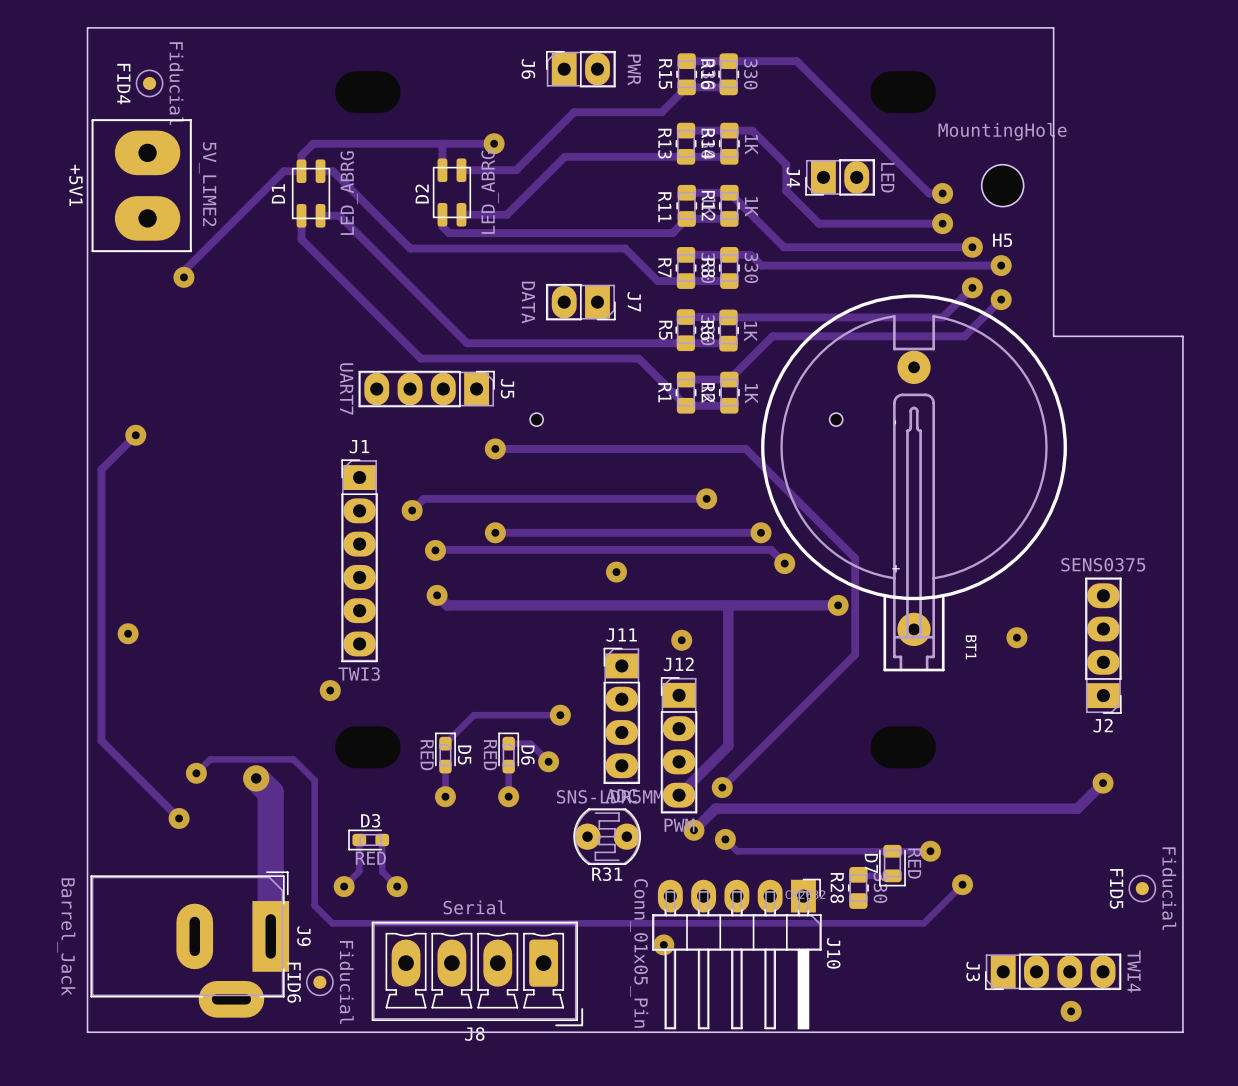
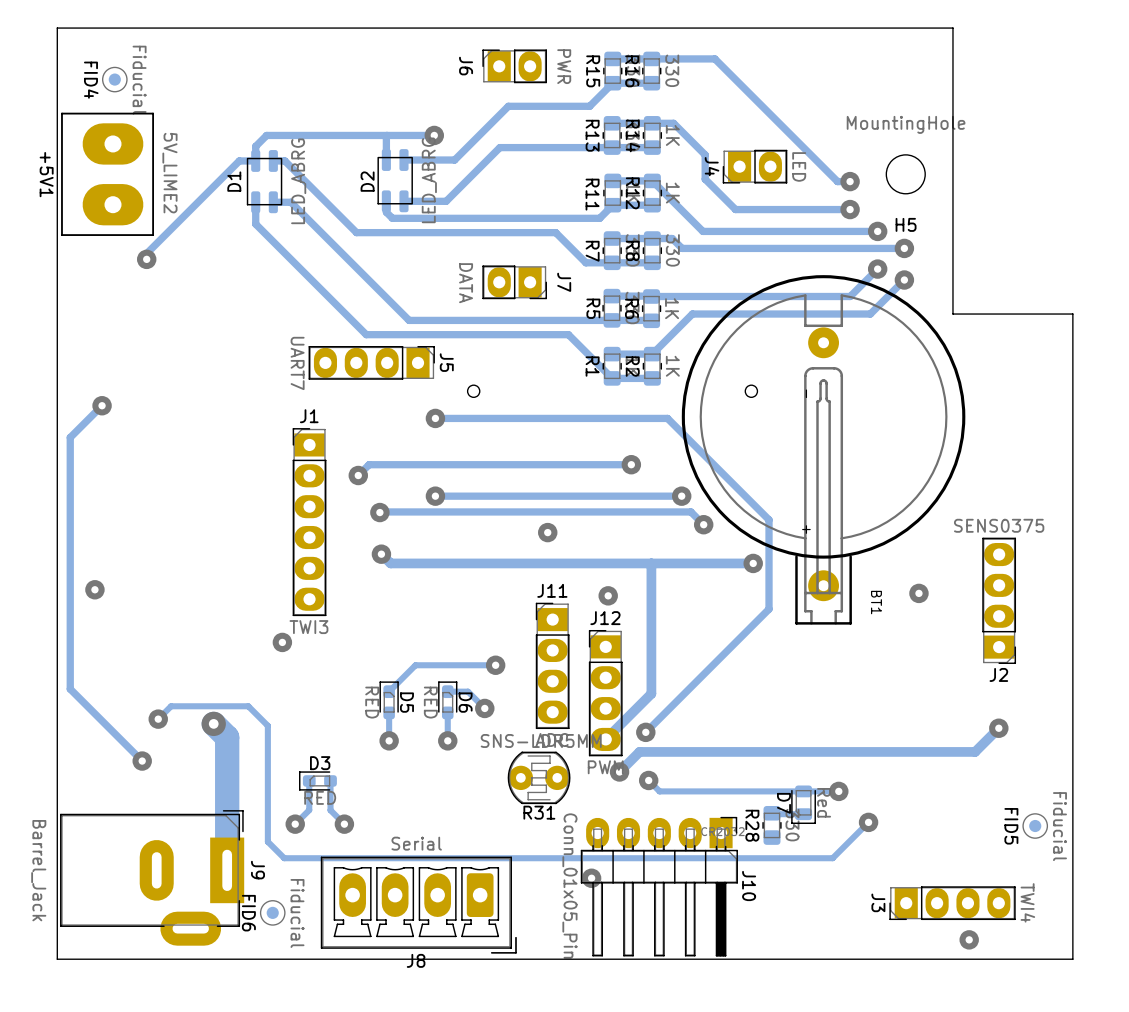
D7 value: RED (914, 863) -> Red (824, 802)

